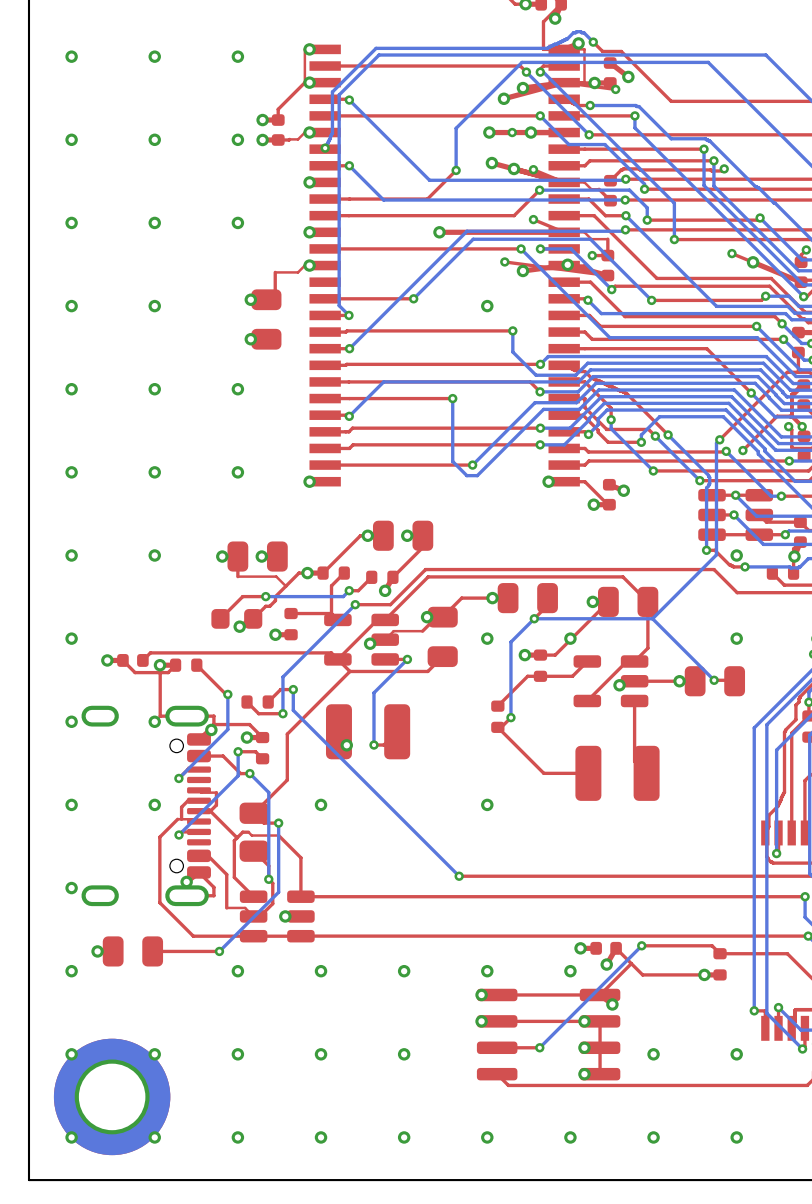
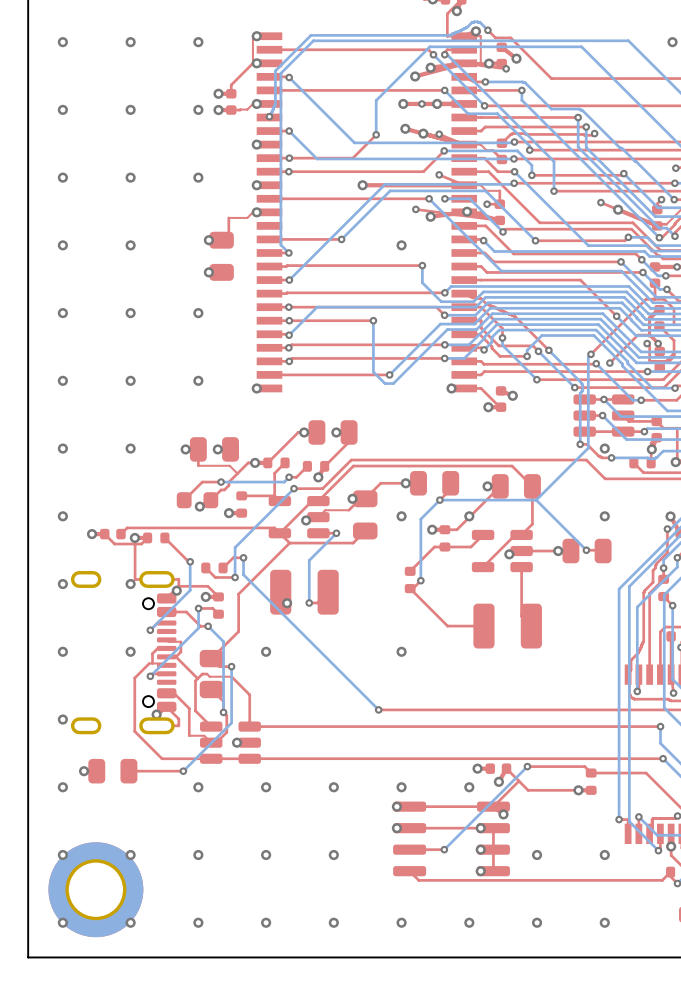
via: none -> (289, 158)
via: none -> (288, 171)
via: none -> (288, 307)
via: none -> (289, 320)
via: none -> (288, 347)
via: none -> (289, 361)

